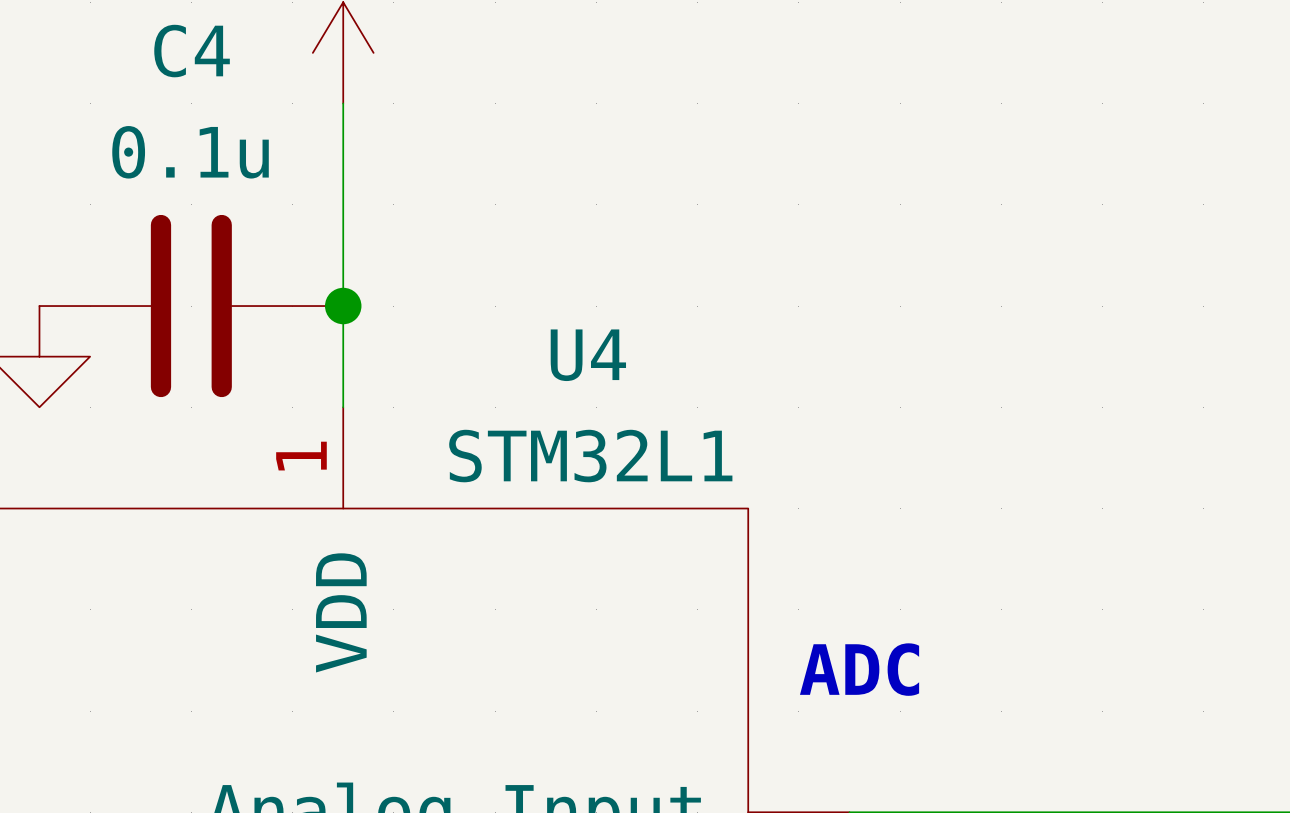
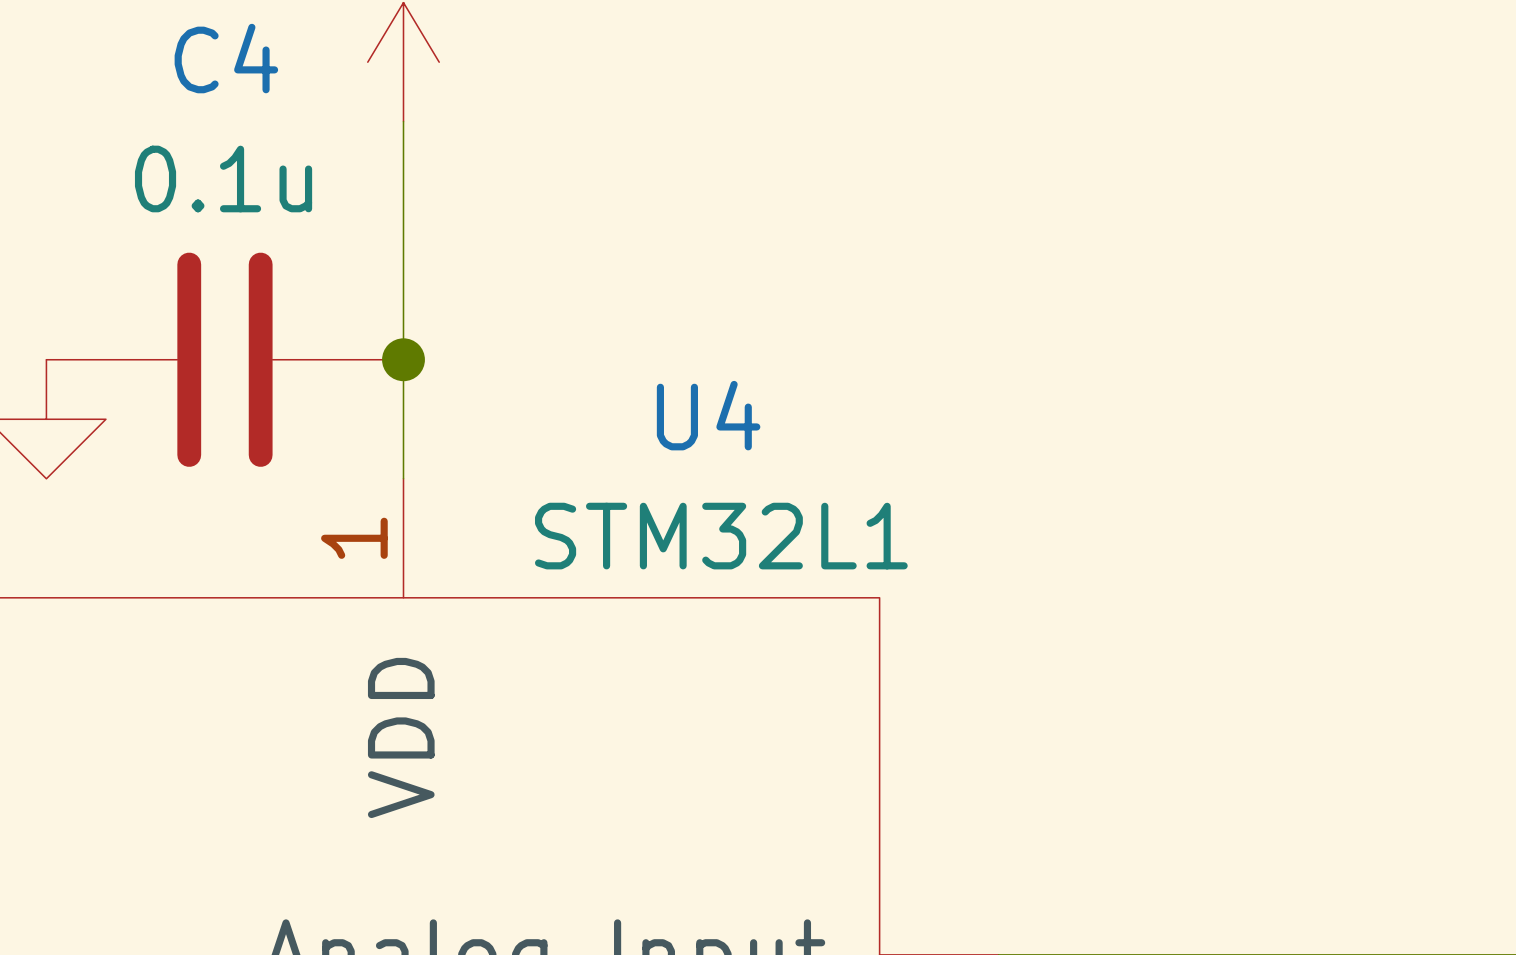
text: ADC (859, 669) -> none

